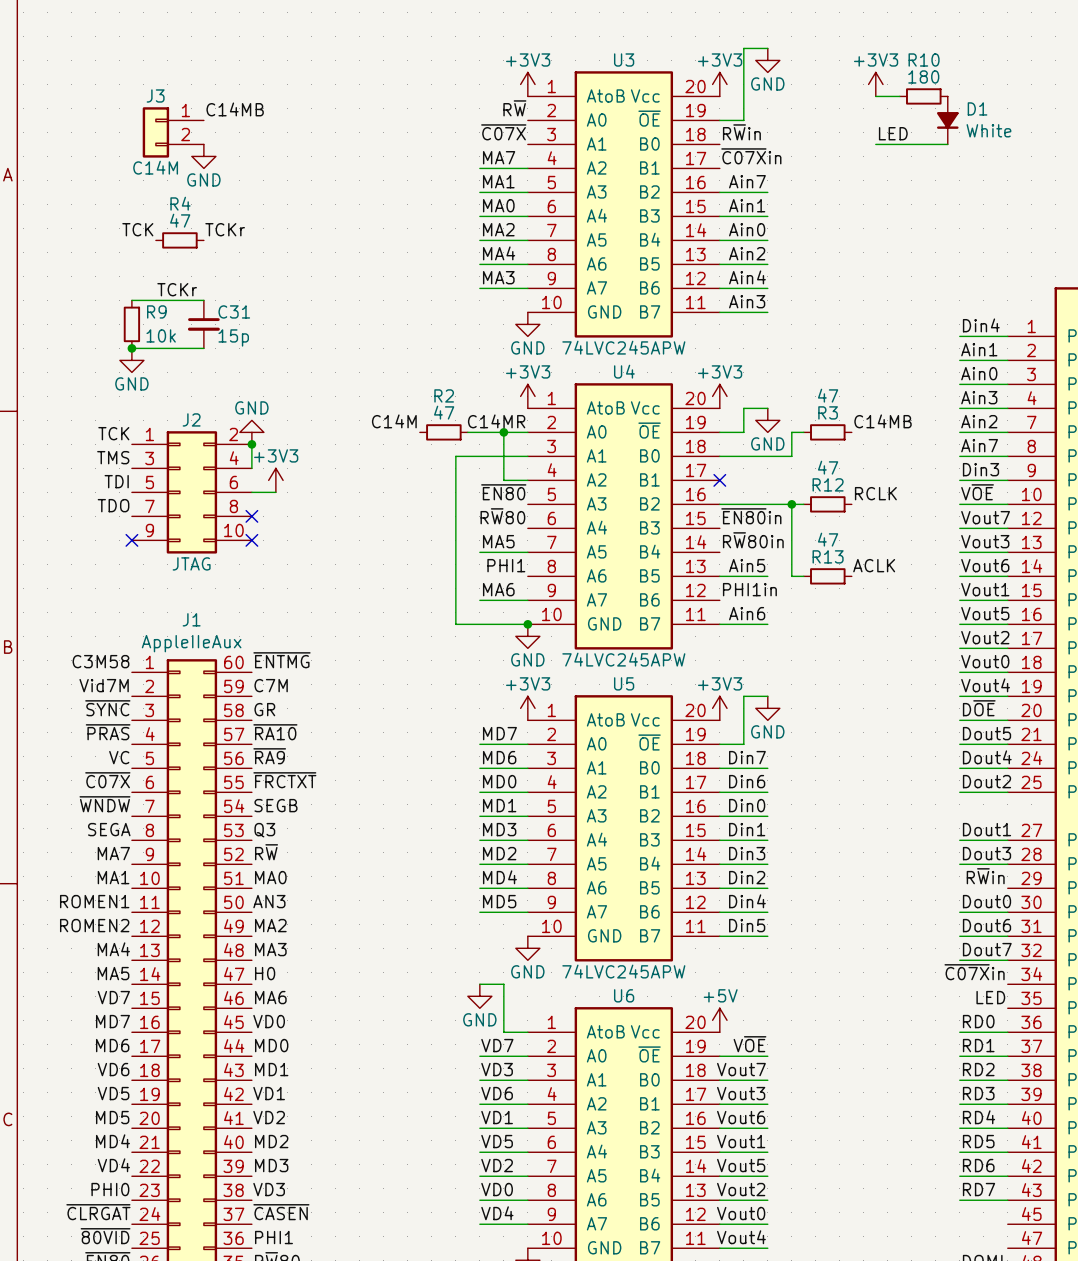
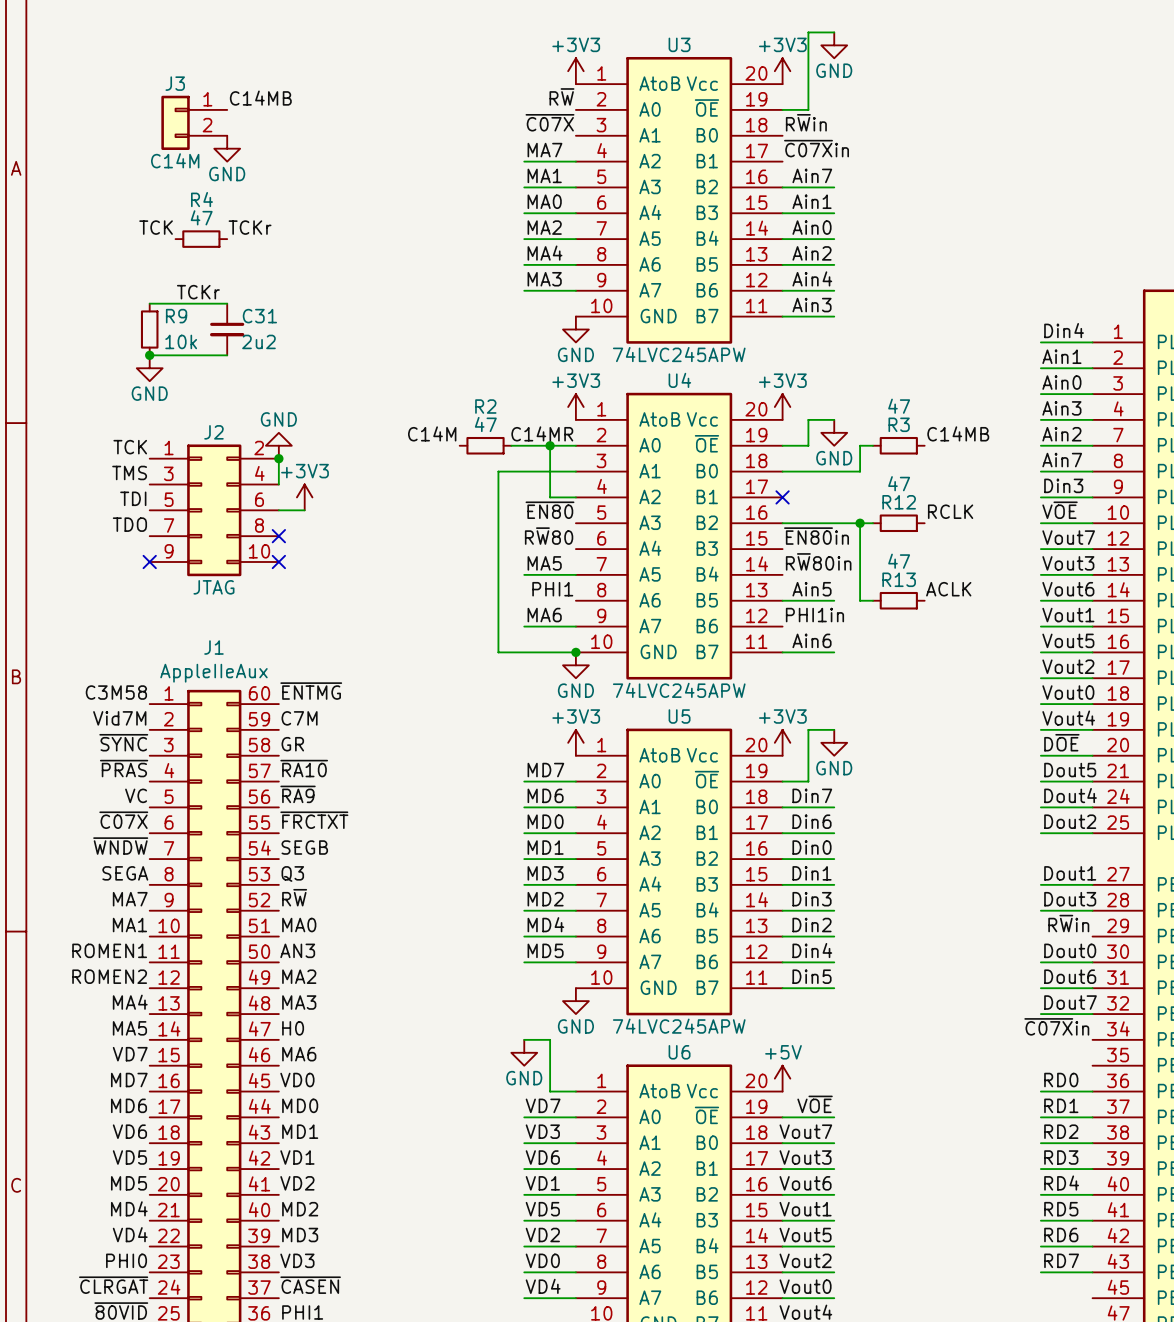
power symbol: +3V3 (875, 84) -> none
wire: (875, 96) (899, 96) -> none
R10: 180 (923, 96) -> none
D1: White (947, 120) -> none
label: LED (893, 133) -> none
wire: (875, 144) (947, 144) -> none
C31 value: 15p (233, 337) -> 2u2 (258, 341)
label: LED (990, 997) -> none

